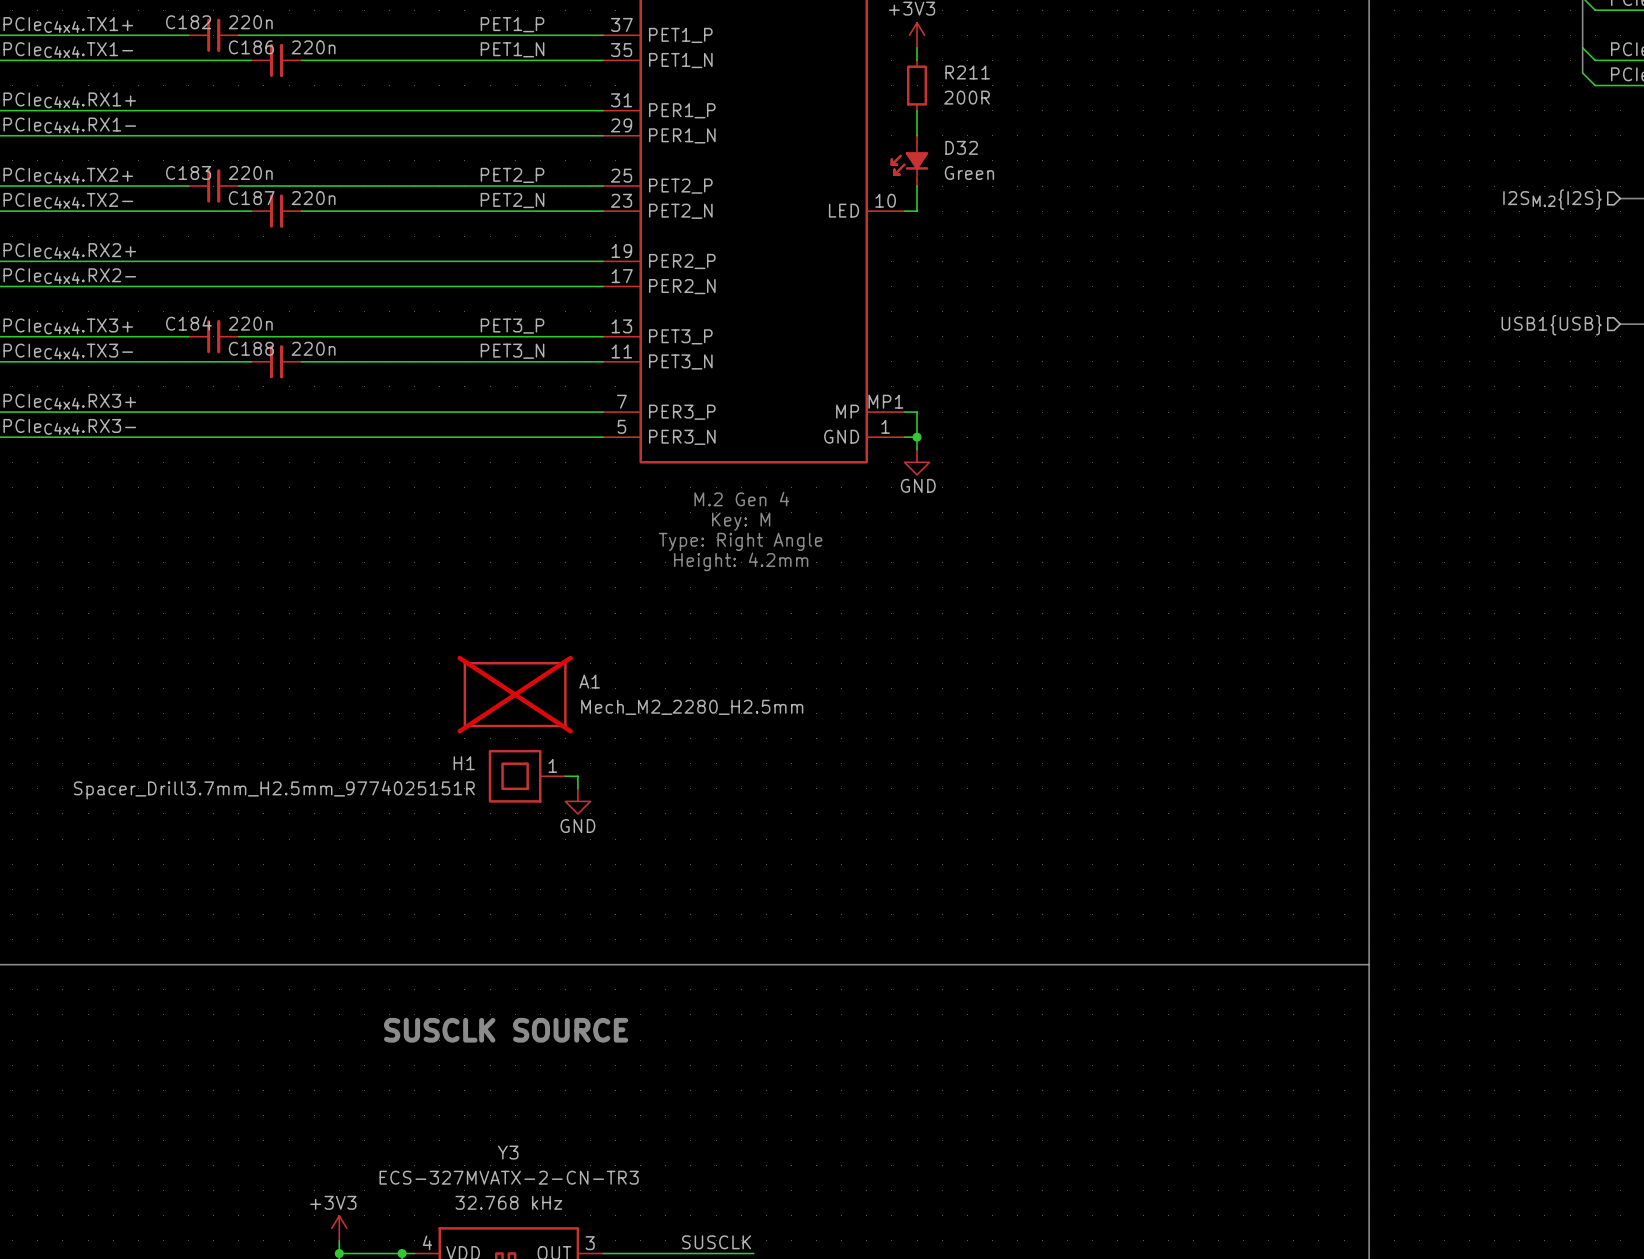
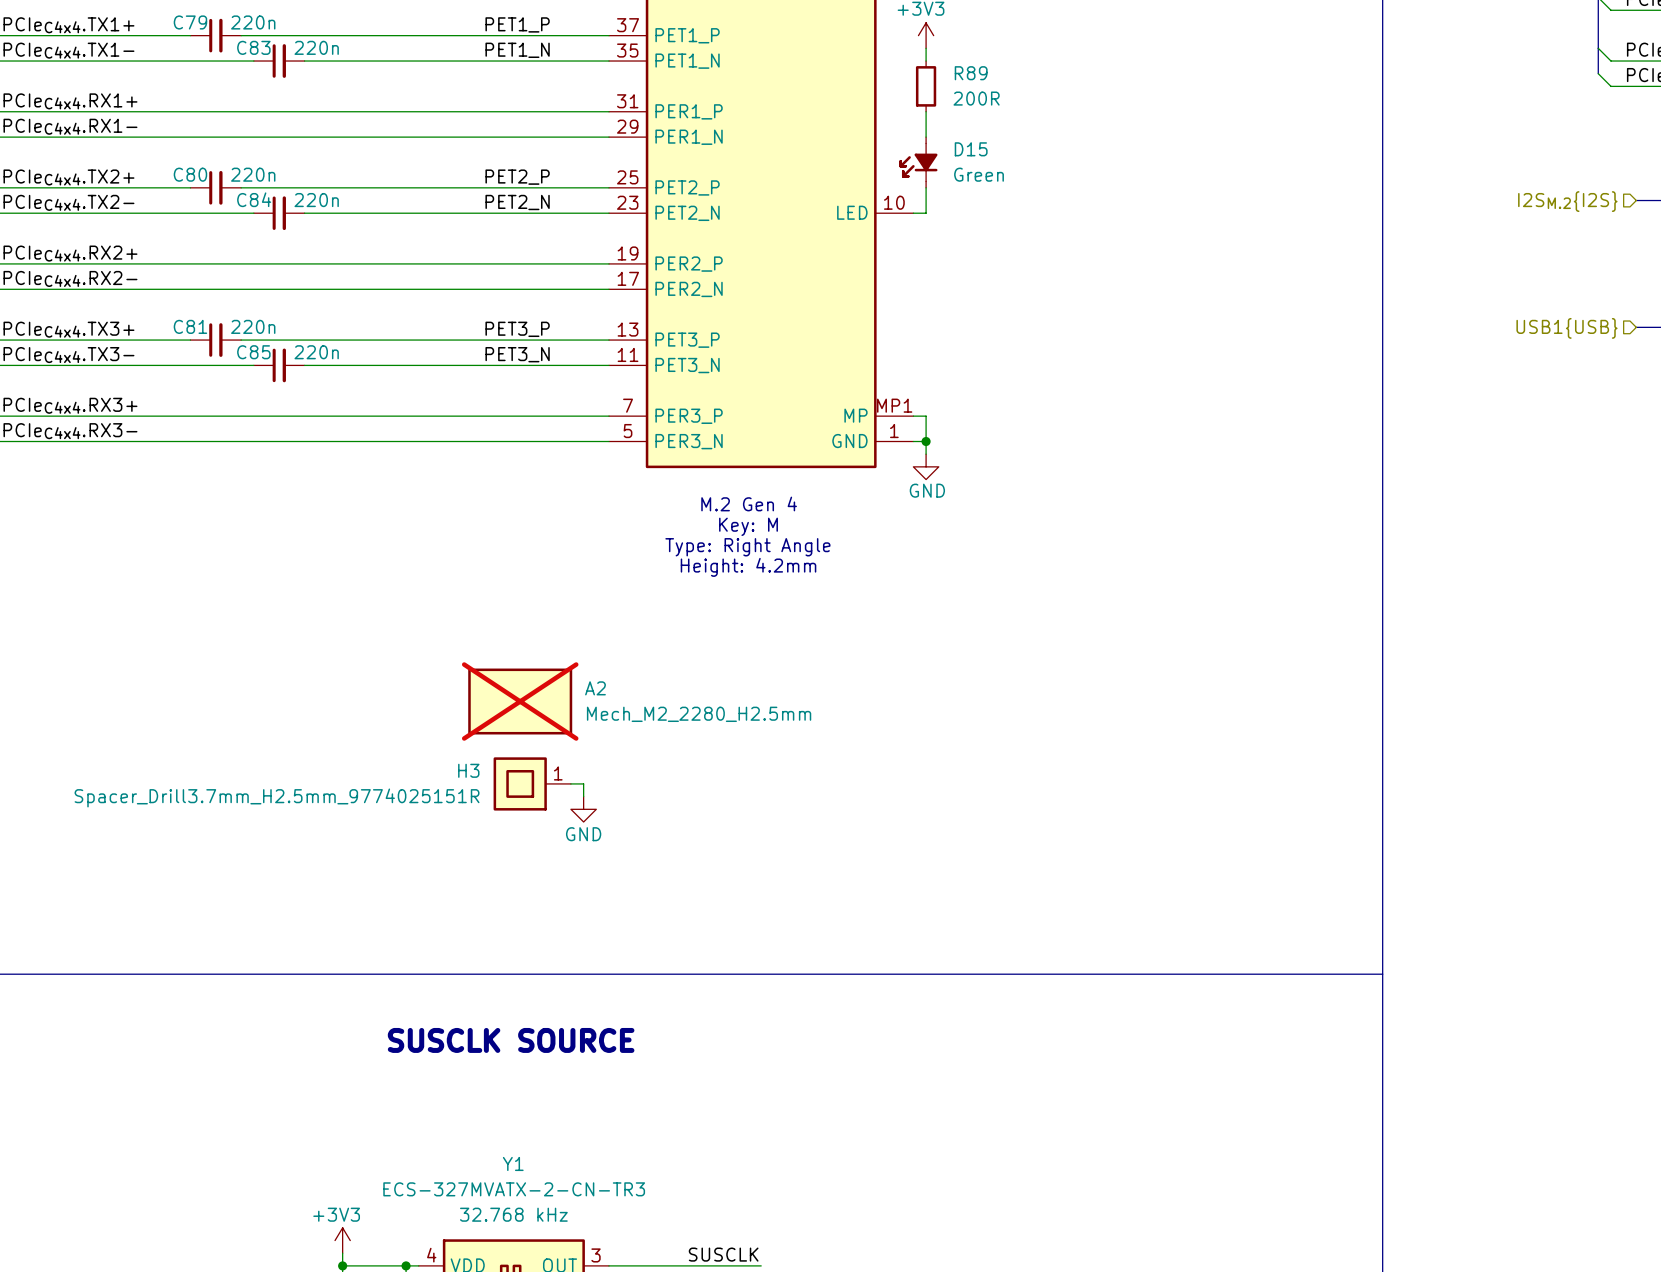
C182 name: C182 (188, 22) -> C79 (190, 22)
C186 name: C186 (251, 47) -> C83 (253, 47)
R211 name: R211 (967, 72) -> R89 (971, 73)
D32 name: D32 (961, 147) -> D15 (971, 149)
C183 name: C183 (188, 172) -> C80 (190, 174)
C187 name: C187 (251, 198) -> C84 (254, 199)
C184 name: C184 (188, 323) -> C81 (190, 326)
C188 name: C188 (251, 348) -> C85 (253, 352)
A1 name: A1 (589, 681) -> A2 (595, 688)
H1 name: H1 (464, 763) -> H3 (468, 770)
Y3 name: Y3 (508, 1152) -> Y1 (513, 1163)

